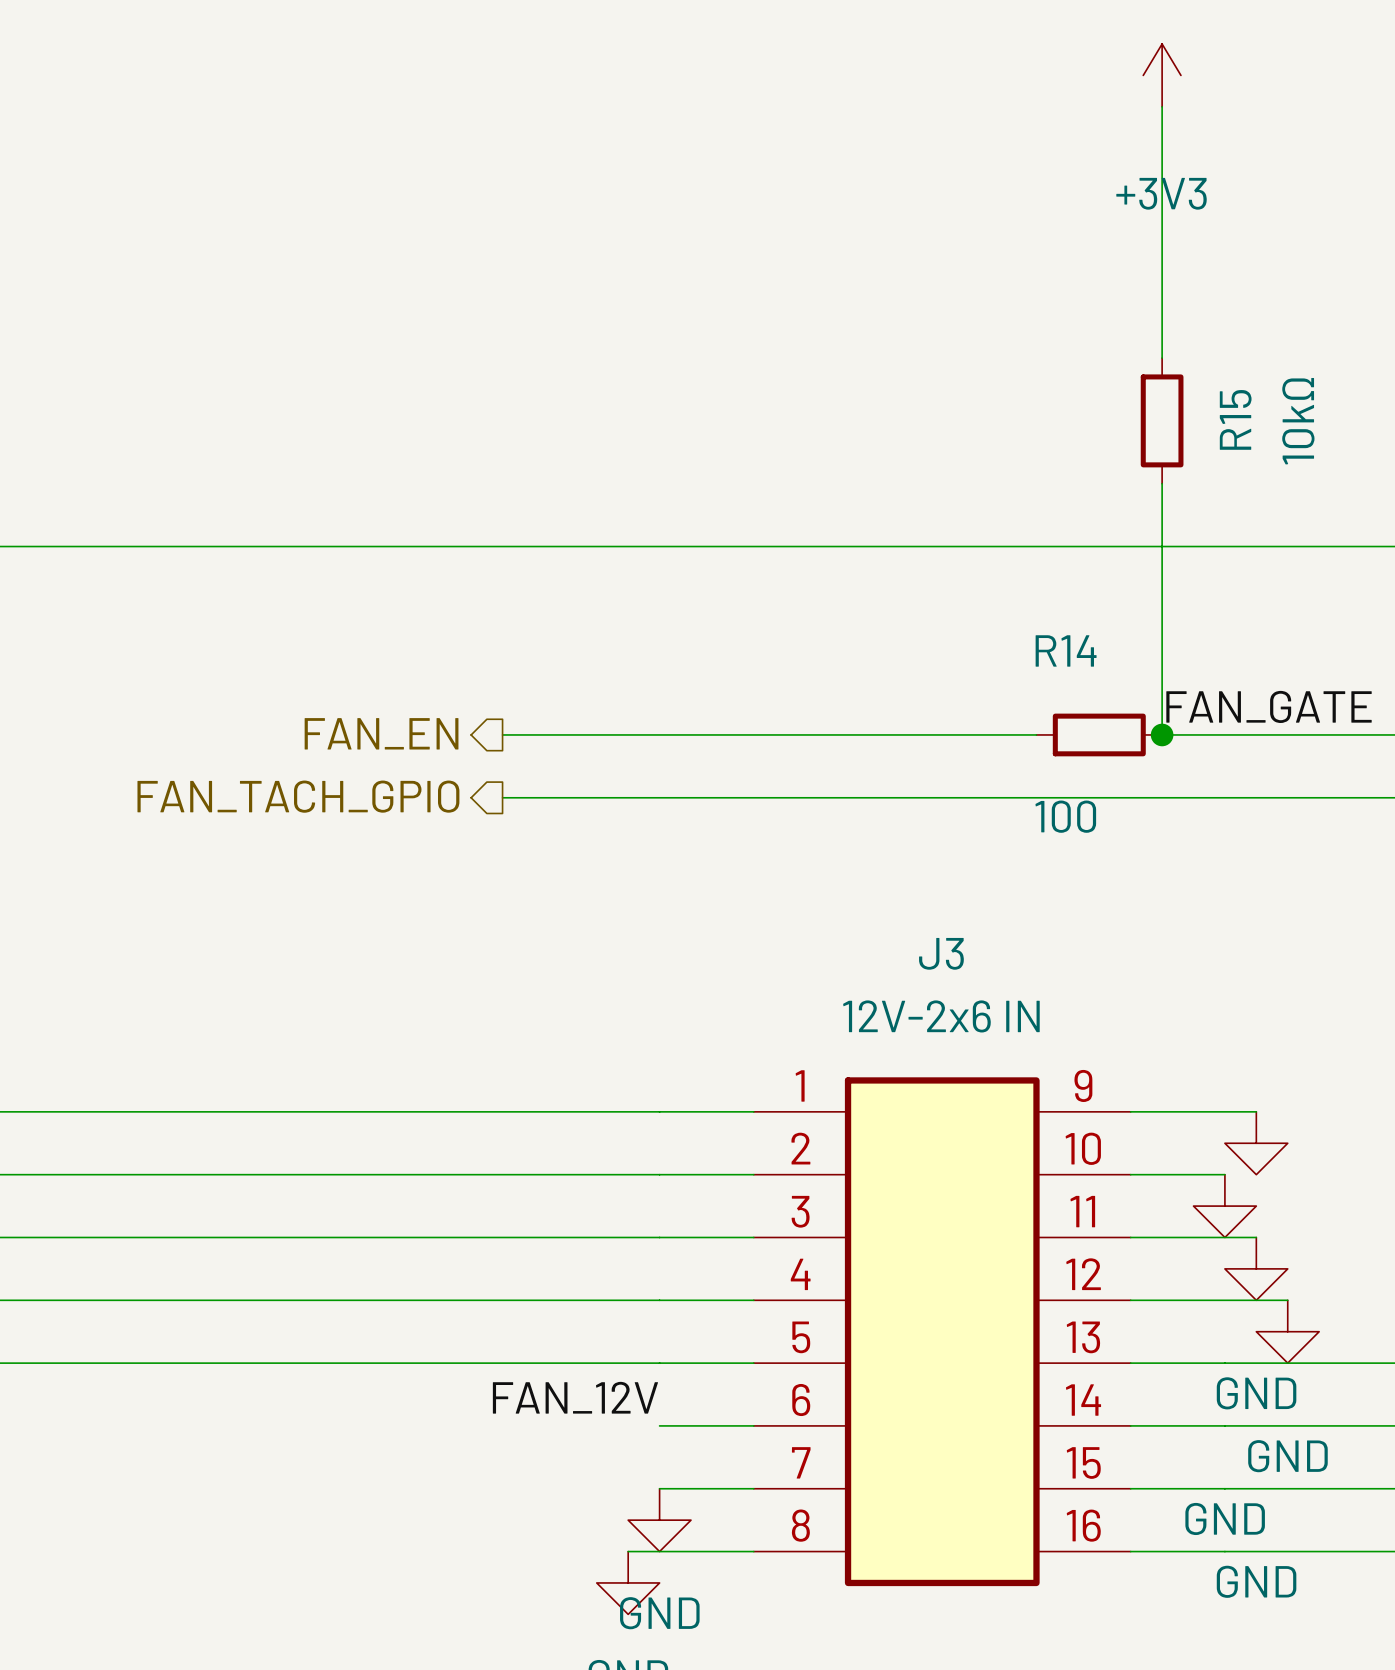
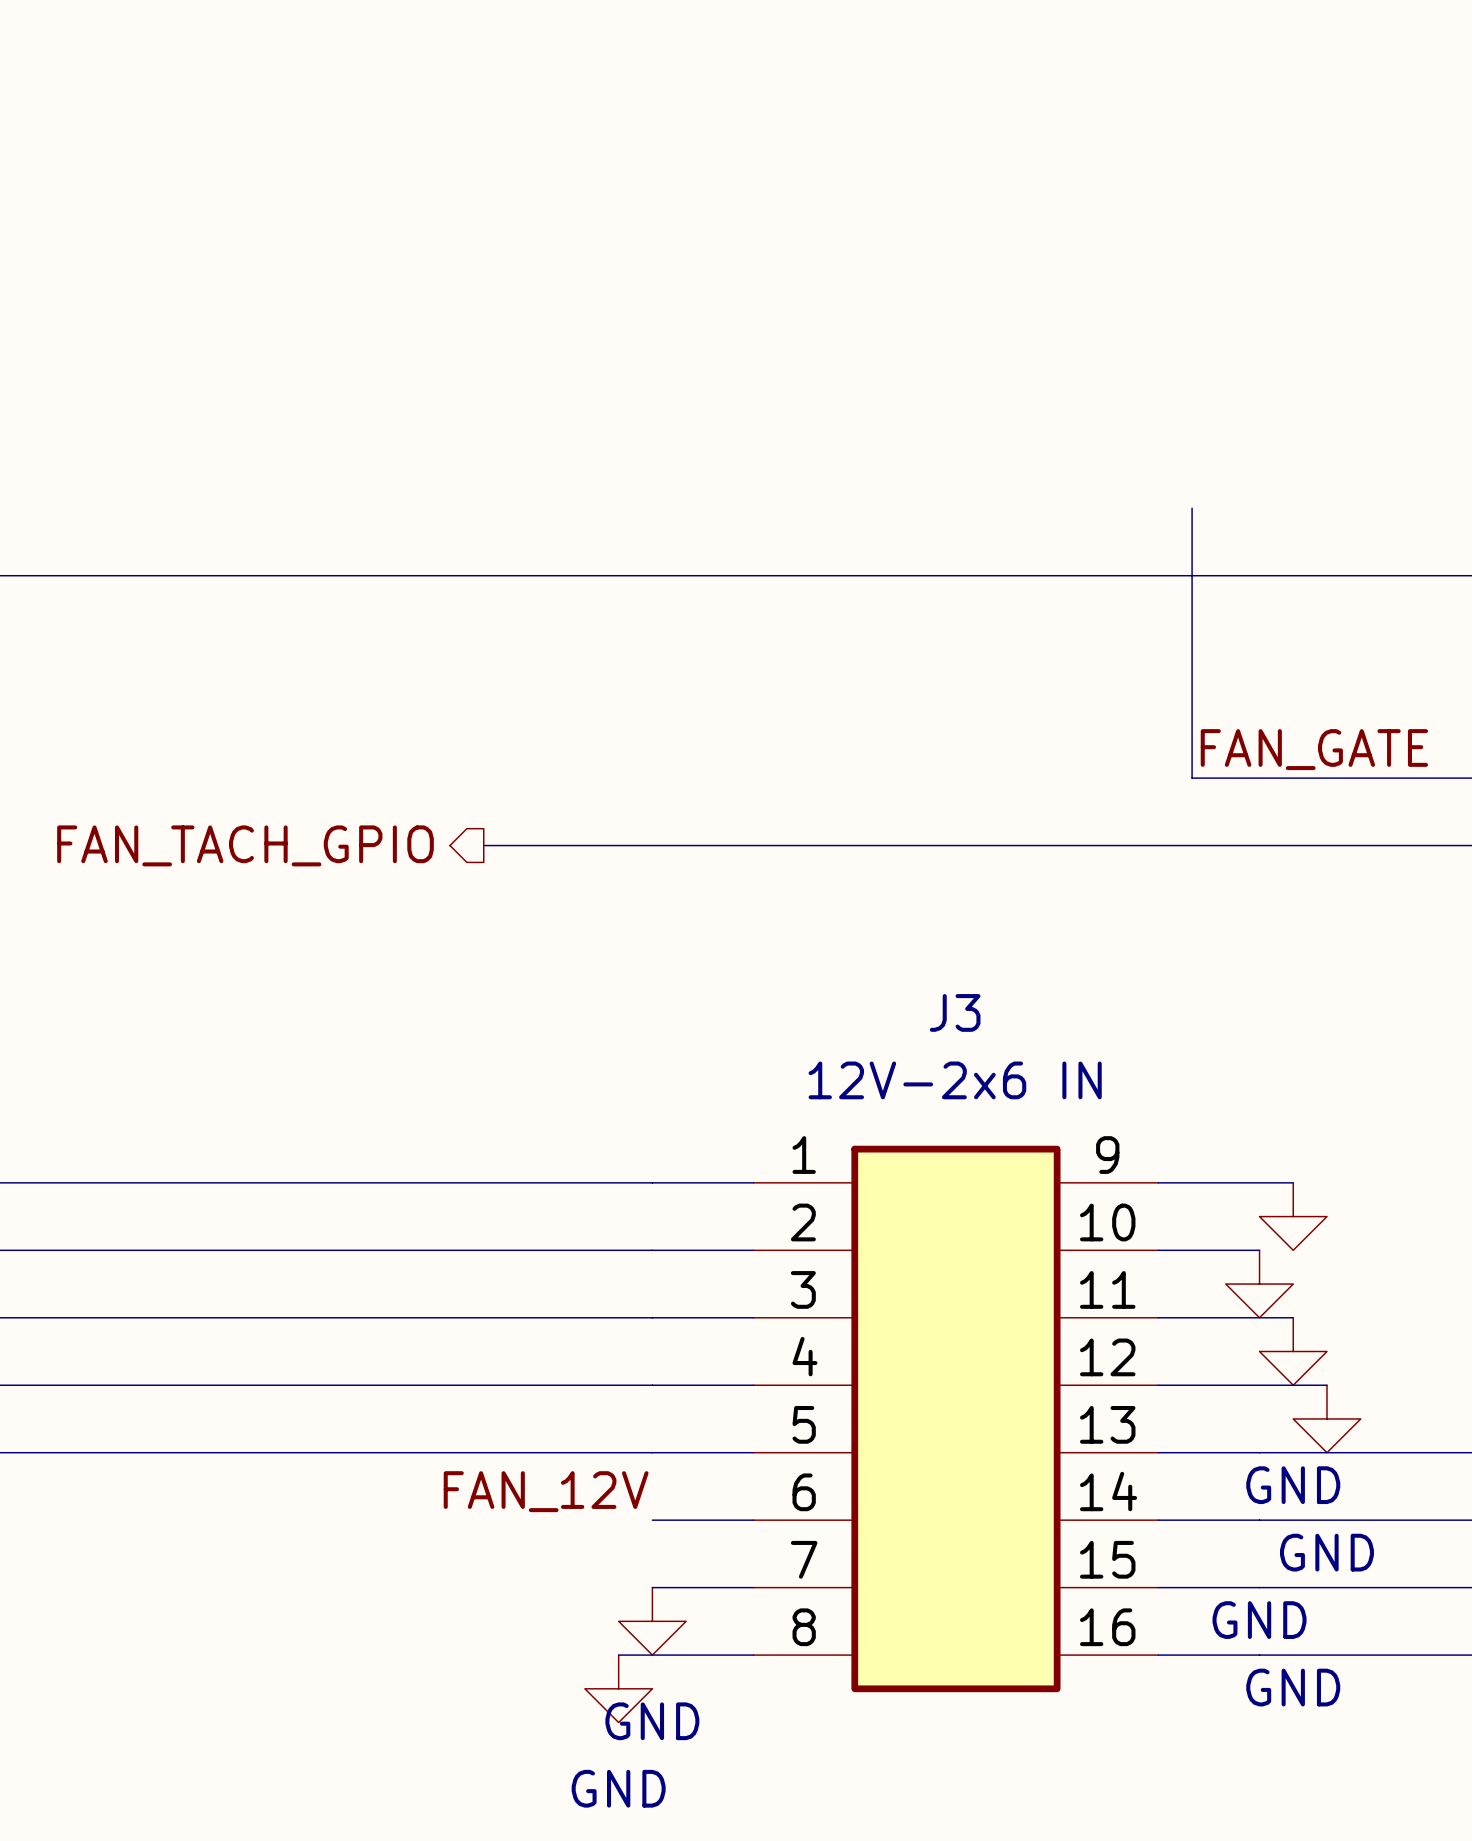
power symbol: +3V3 (1162, 75) -> none
wire: (1162, 106) (1162, 358) -> none
R15: 10kΩ (1162, 420) -> none
hierarchical label: FAN_EN (381, 733) -> none
wire: (502, 734) (1036, 734) -> none
R14: 100 (1099, 734) -> none
junction: (1162, 734) -> none

